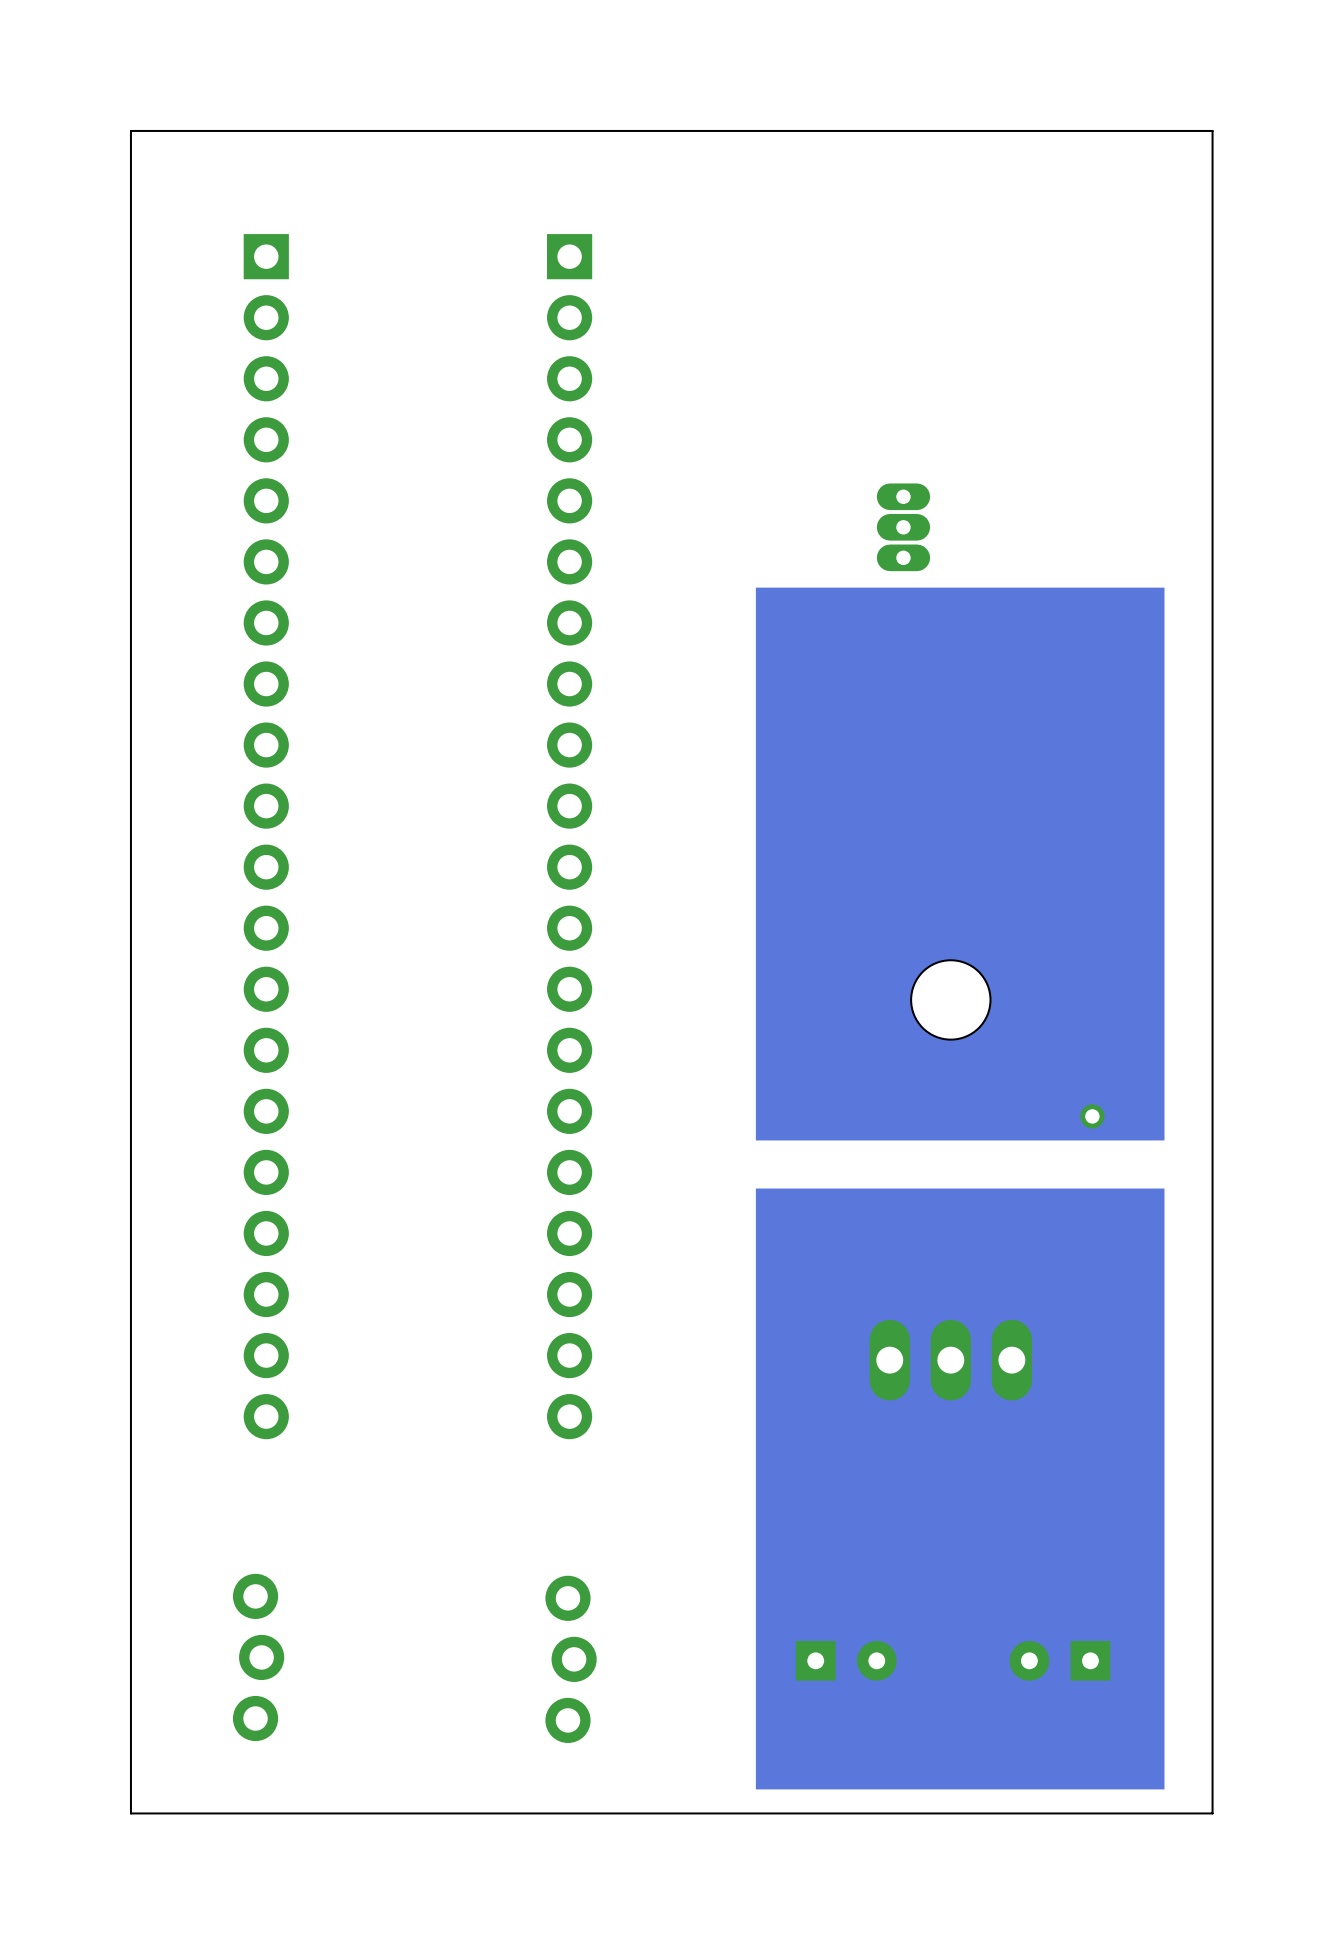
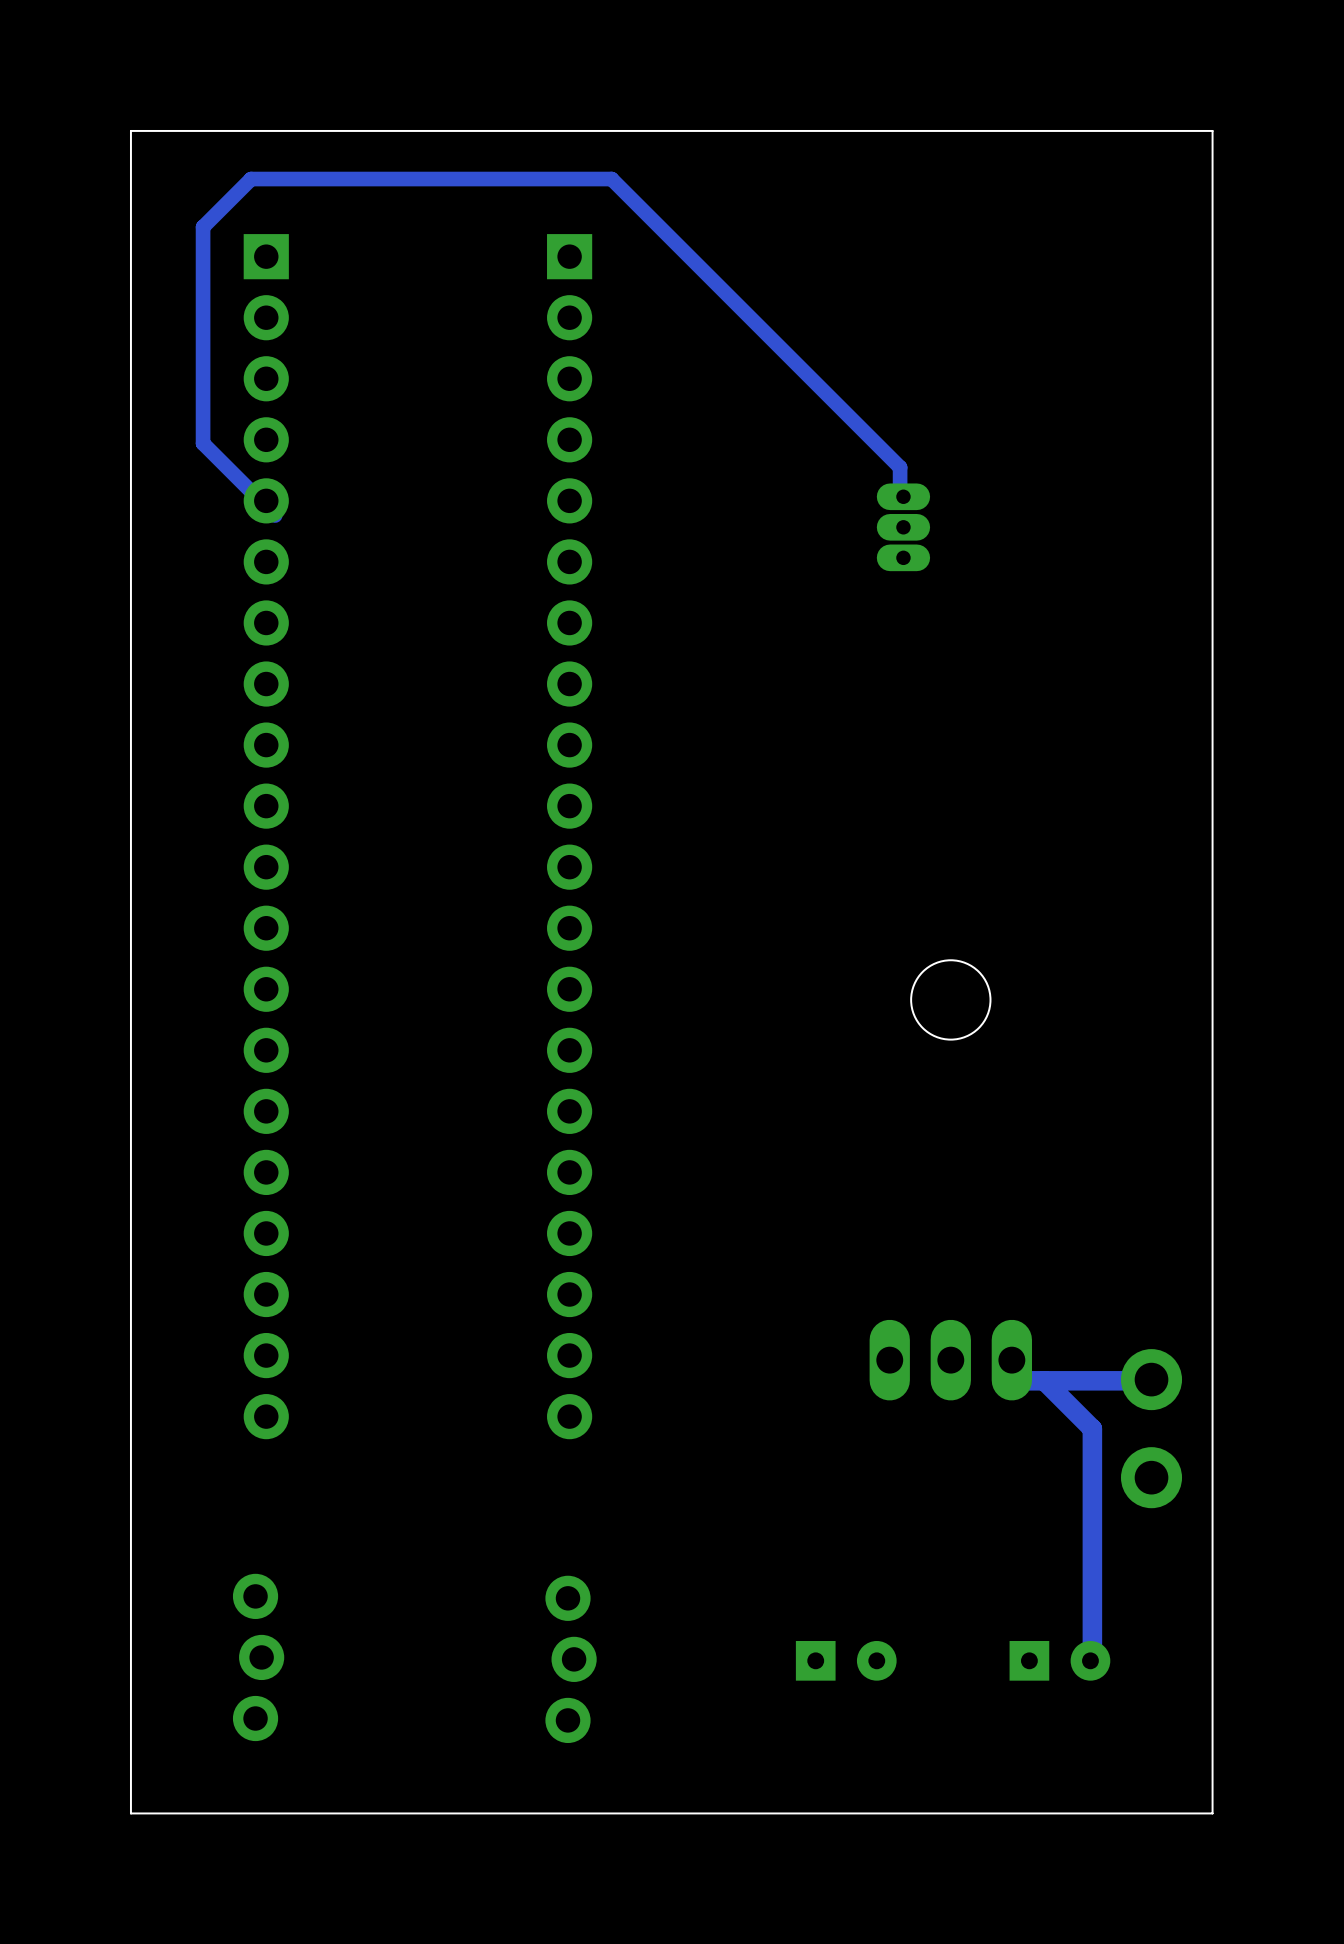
track: none -> (900, 491) (900, 467) (611, 179) (251, 179) (203, 227) (203, 443) (275, 515)
drawing: [755, 587, 1165, 1141] -> none
via: (1092, 1116) -> none
drawing: [755, 1188, 1165, 1790] -> none
via: none -> (1151, 1379)
track: none -> (1044, 1380) (1092, 1428) (1092, 1669)
track: none -> (1164, 1380) (1020, 1380)
via: none -> (1151, 1477)
part rotation: 0° (1059, 1660) -> 180° (1059, 1660)

